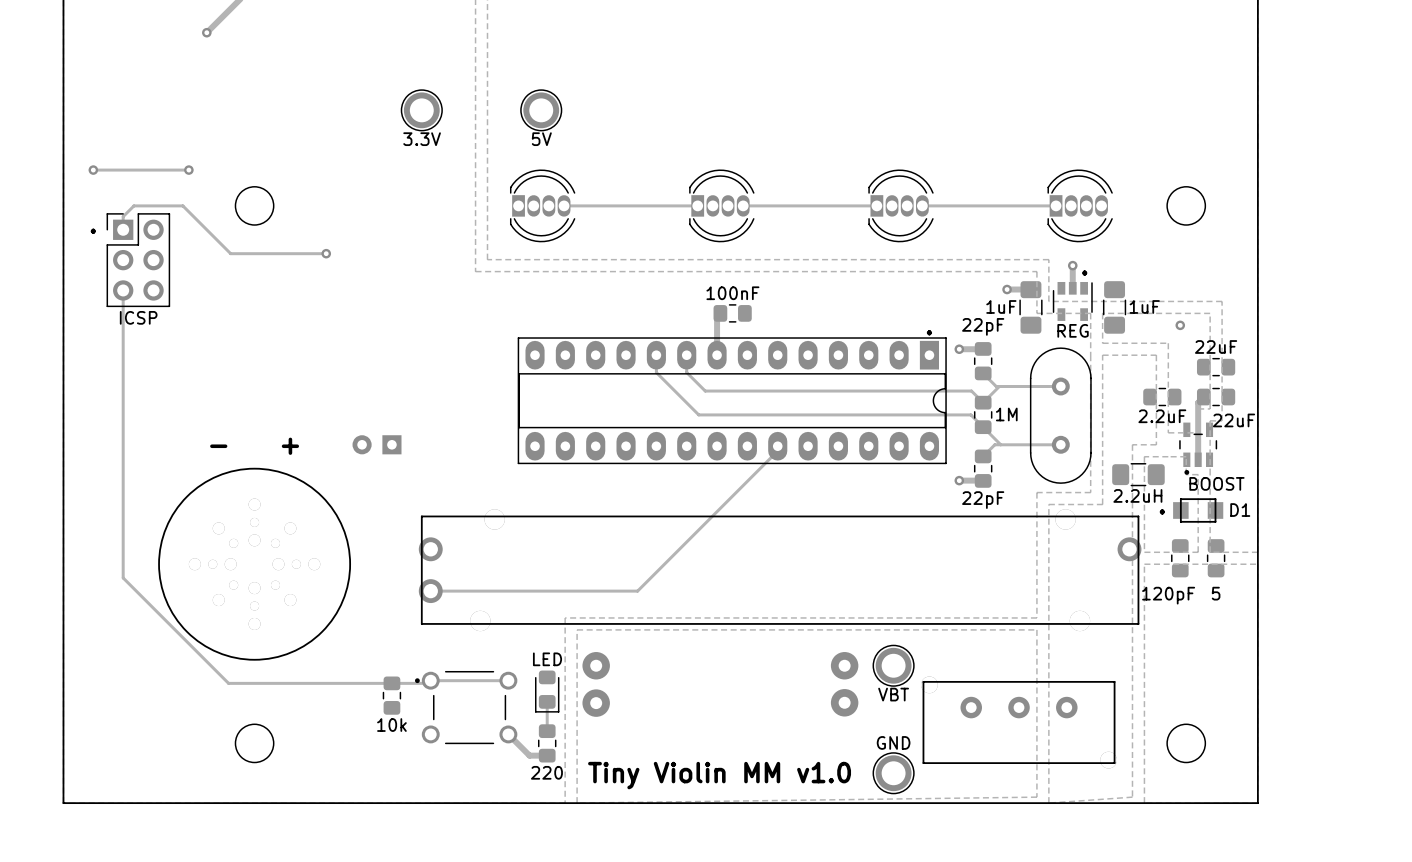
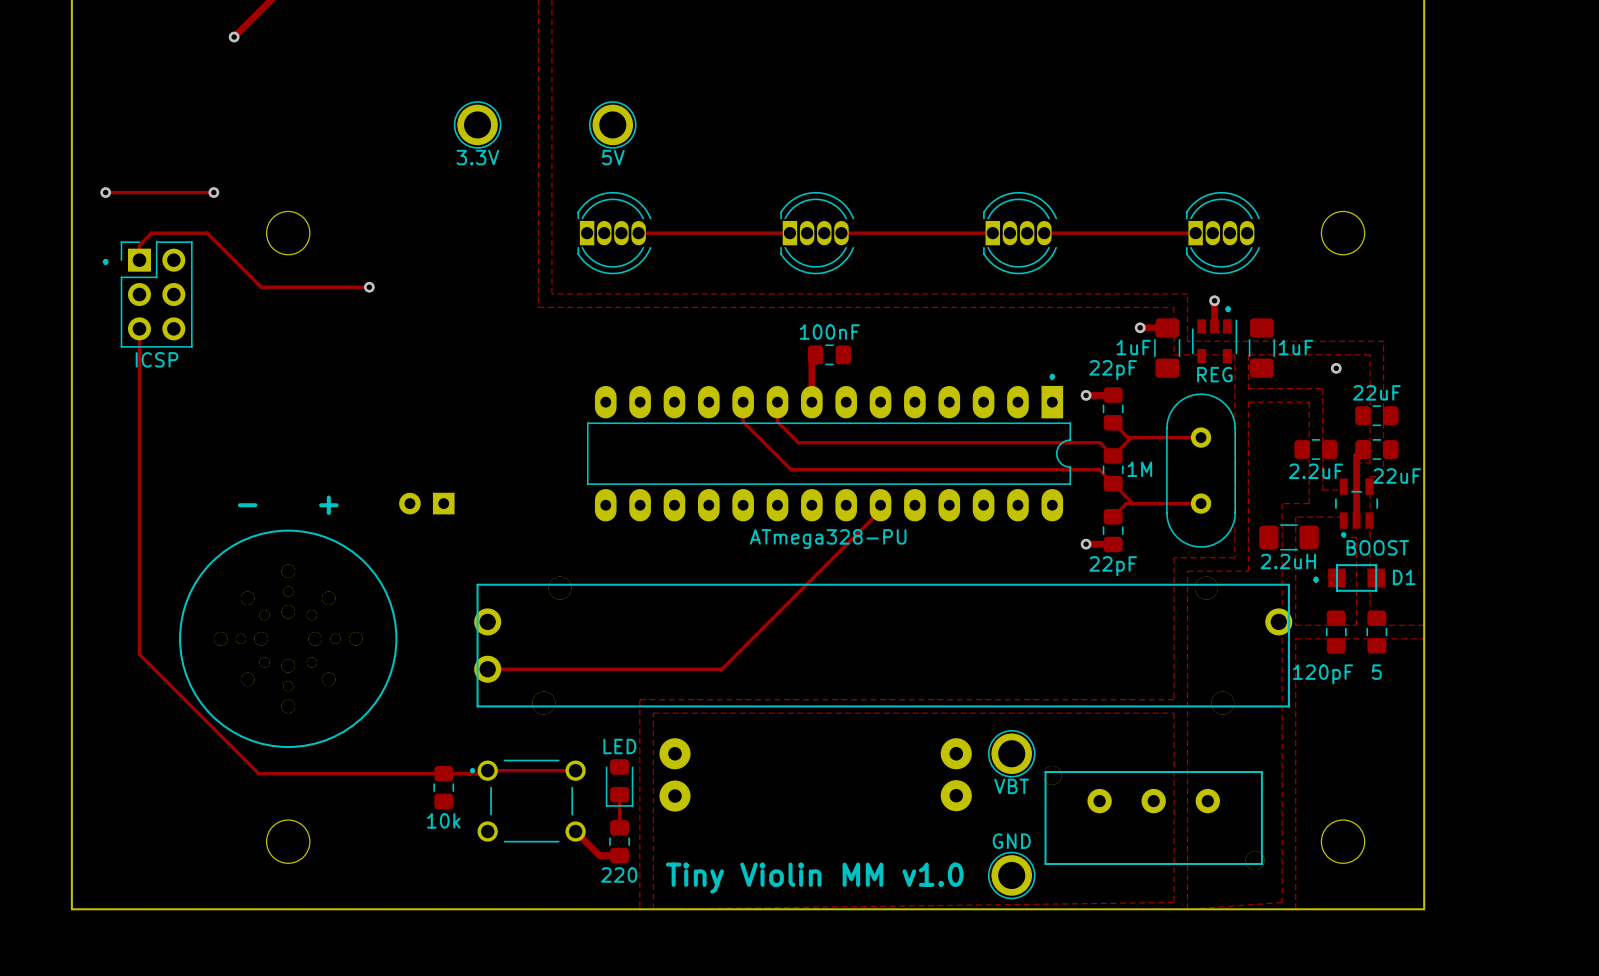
part footprint: [517, 337, 947, 465] -> [586, 385, 1072, 522]
part value: none -> ATmega328-PU (828, 539)

